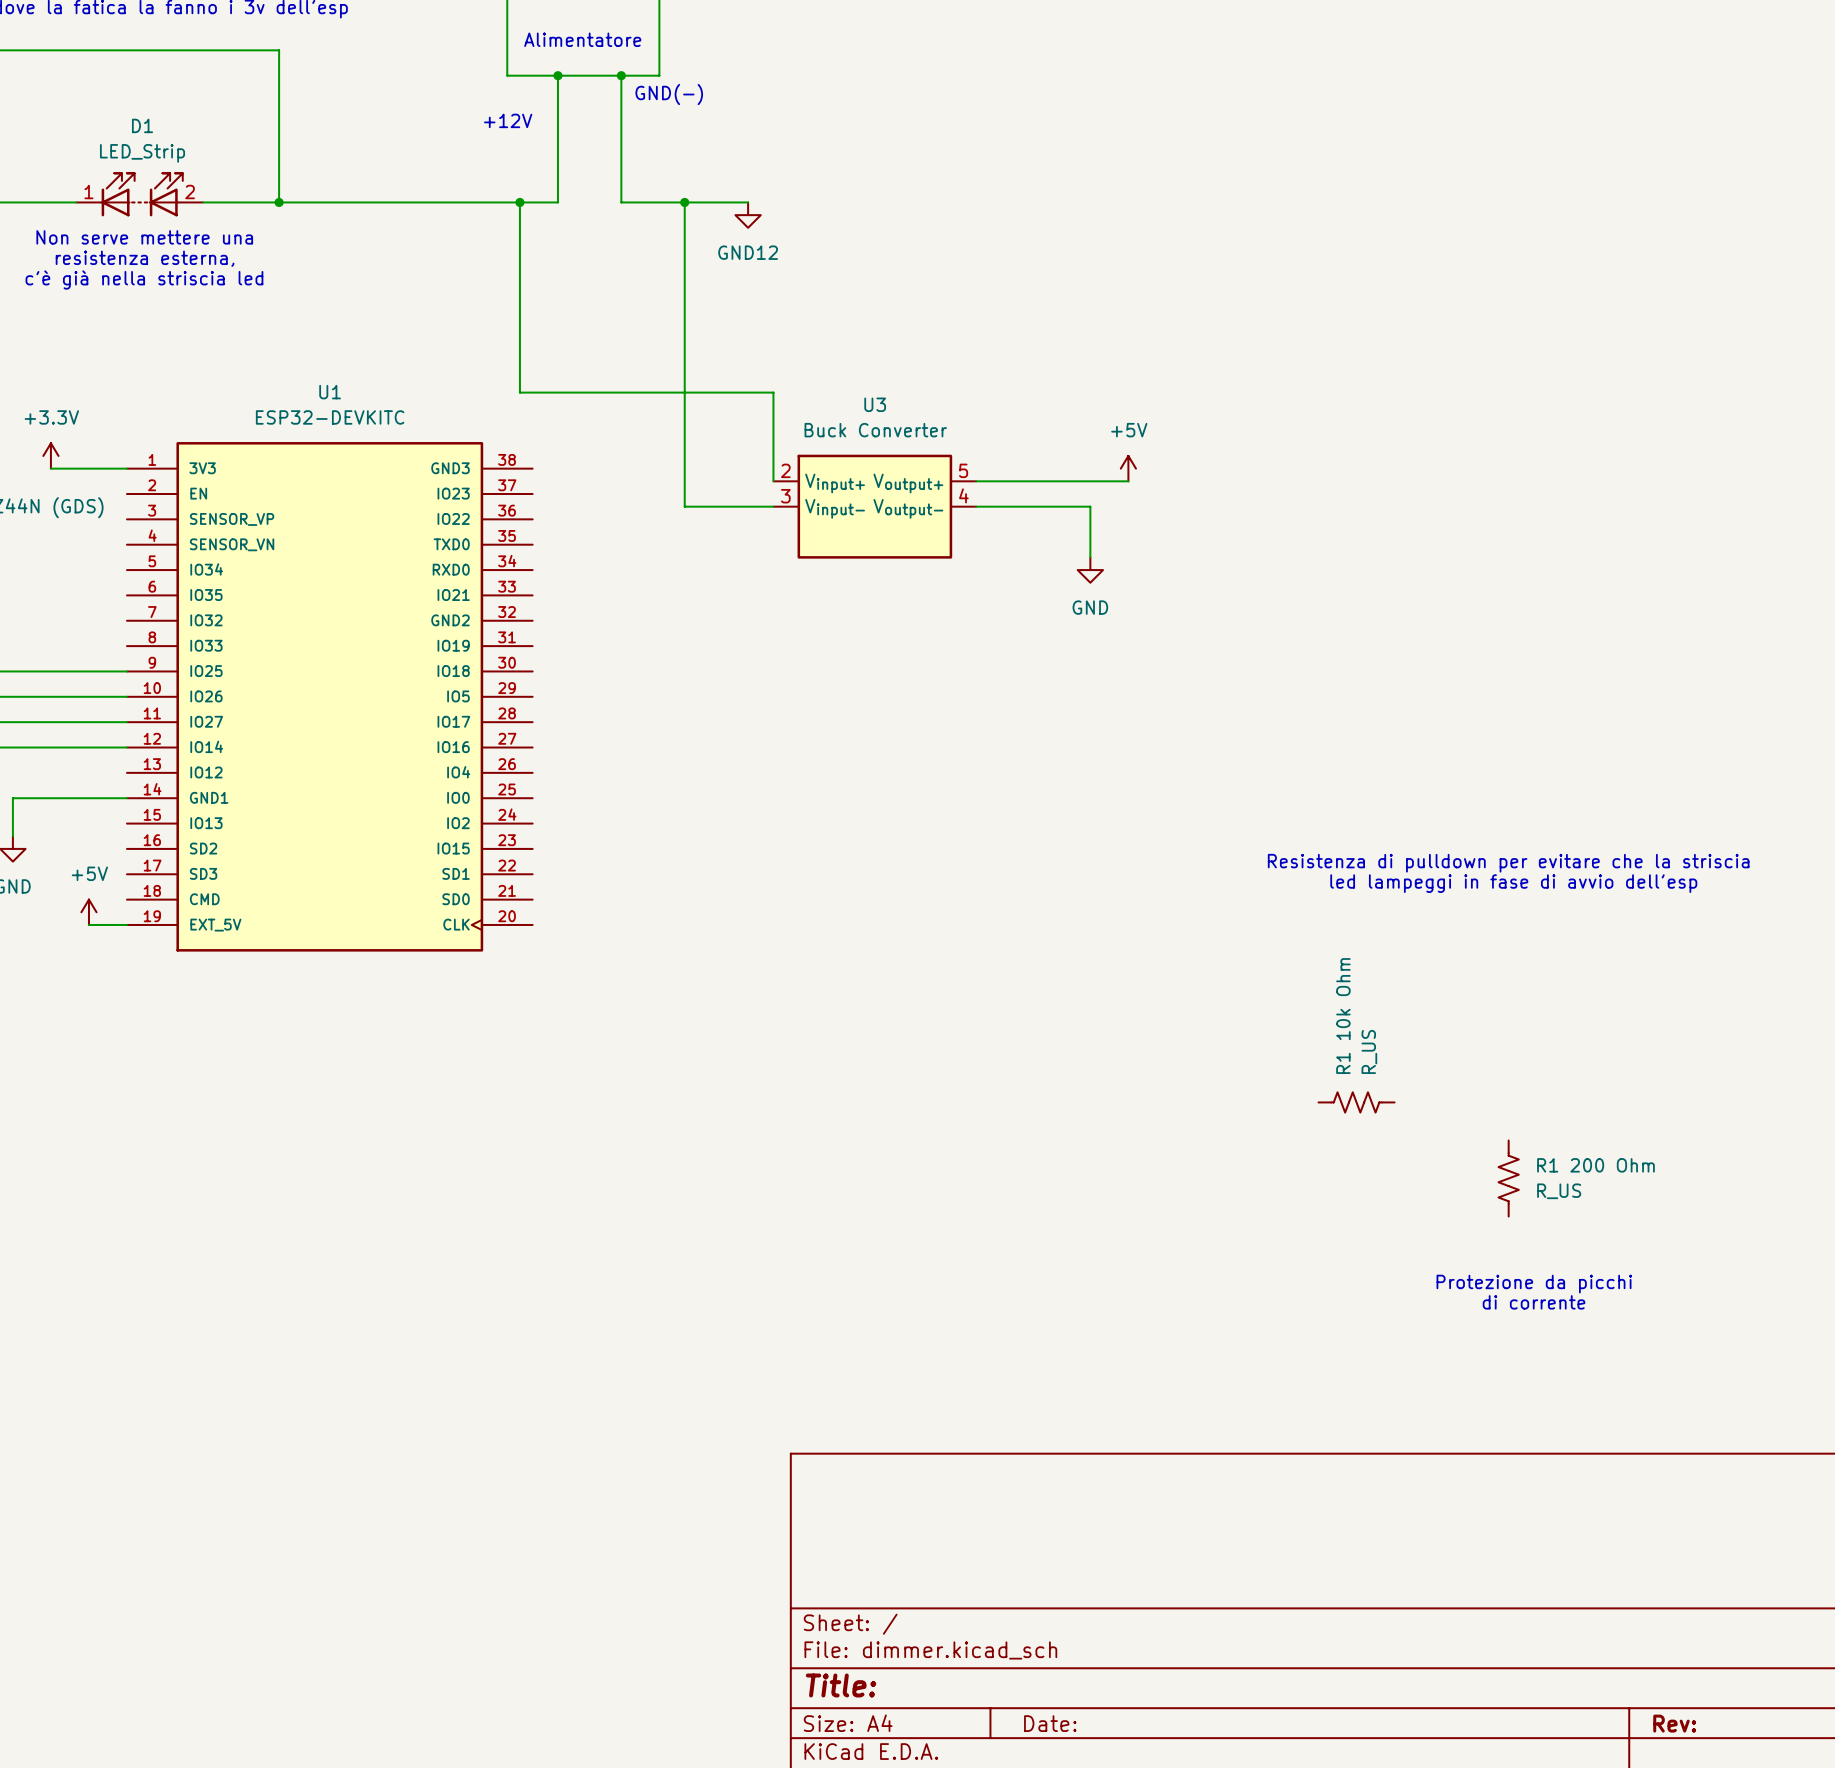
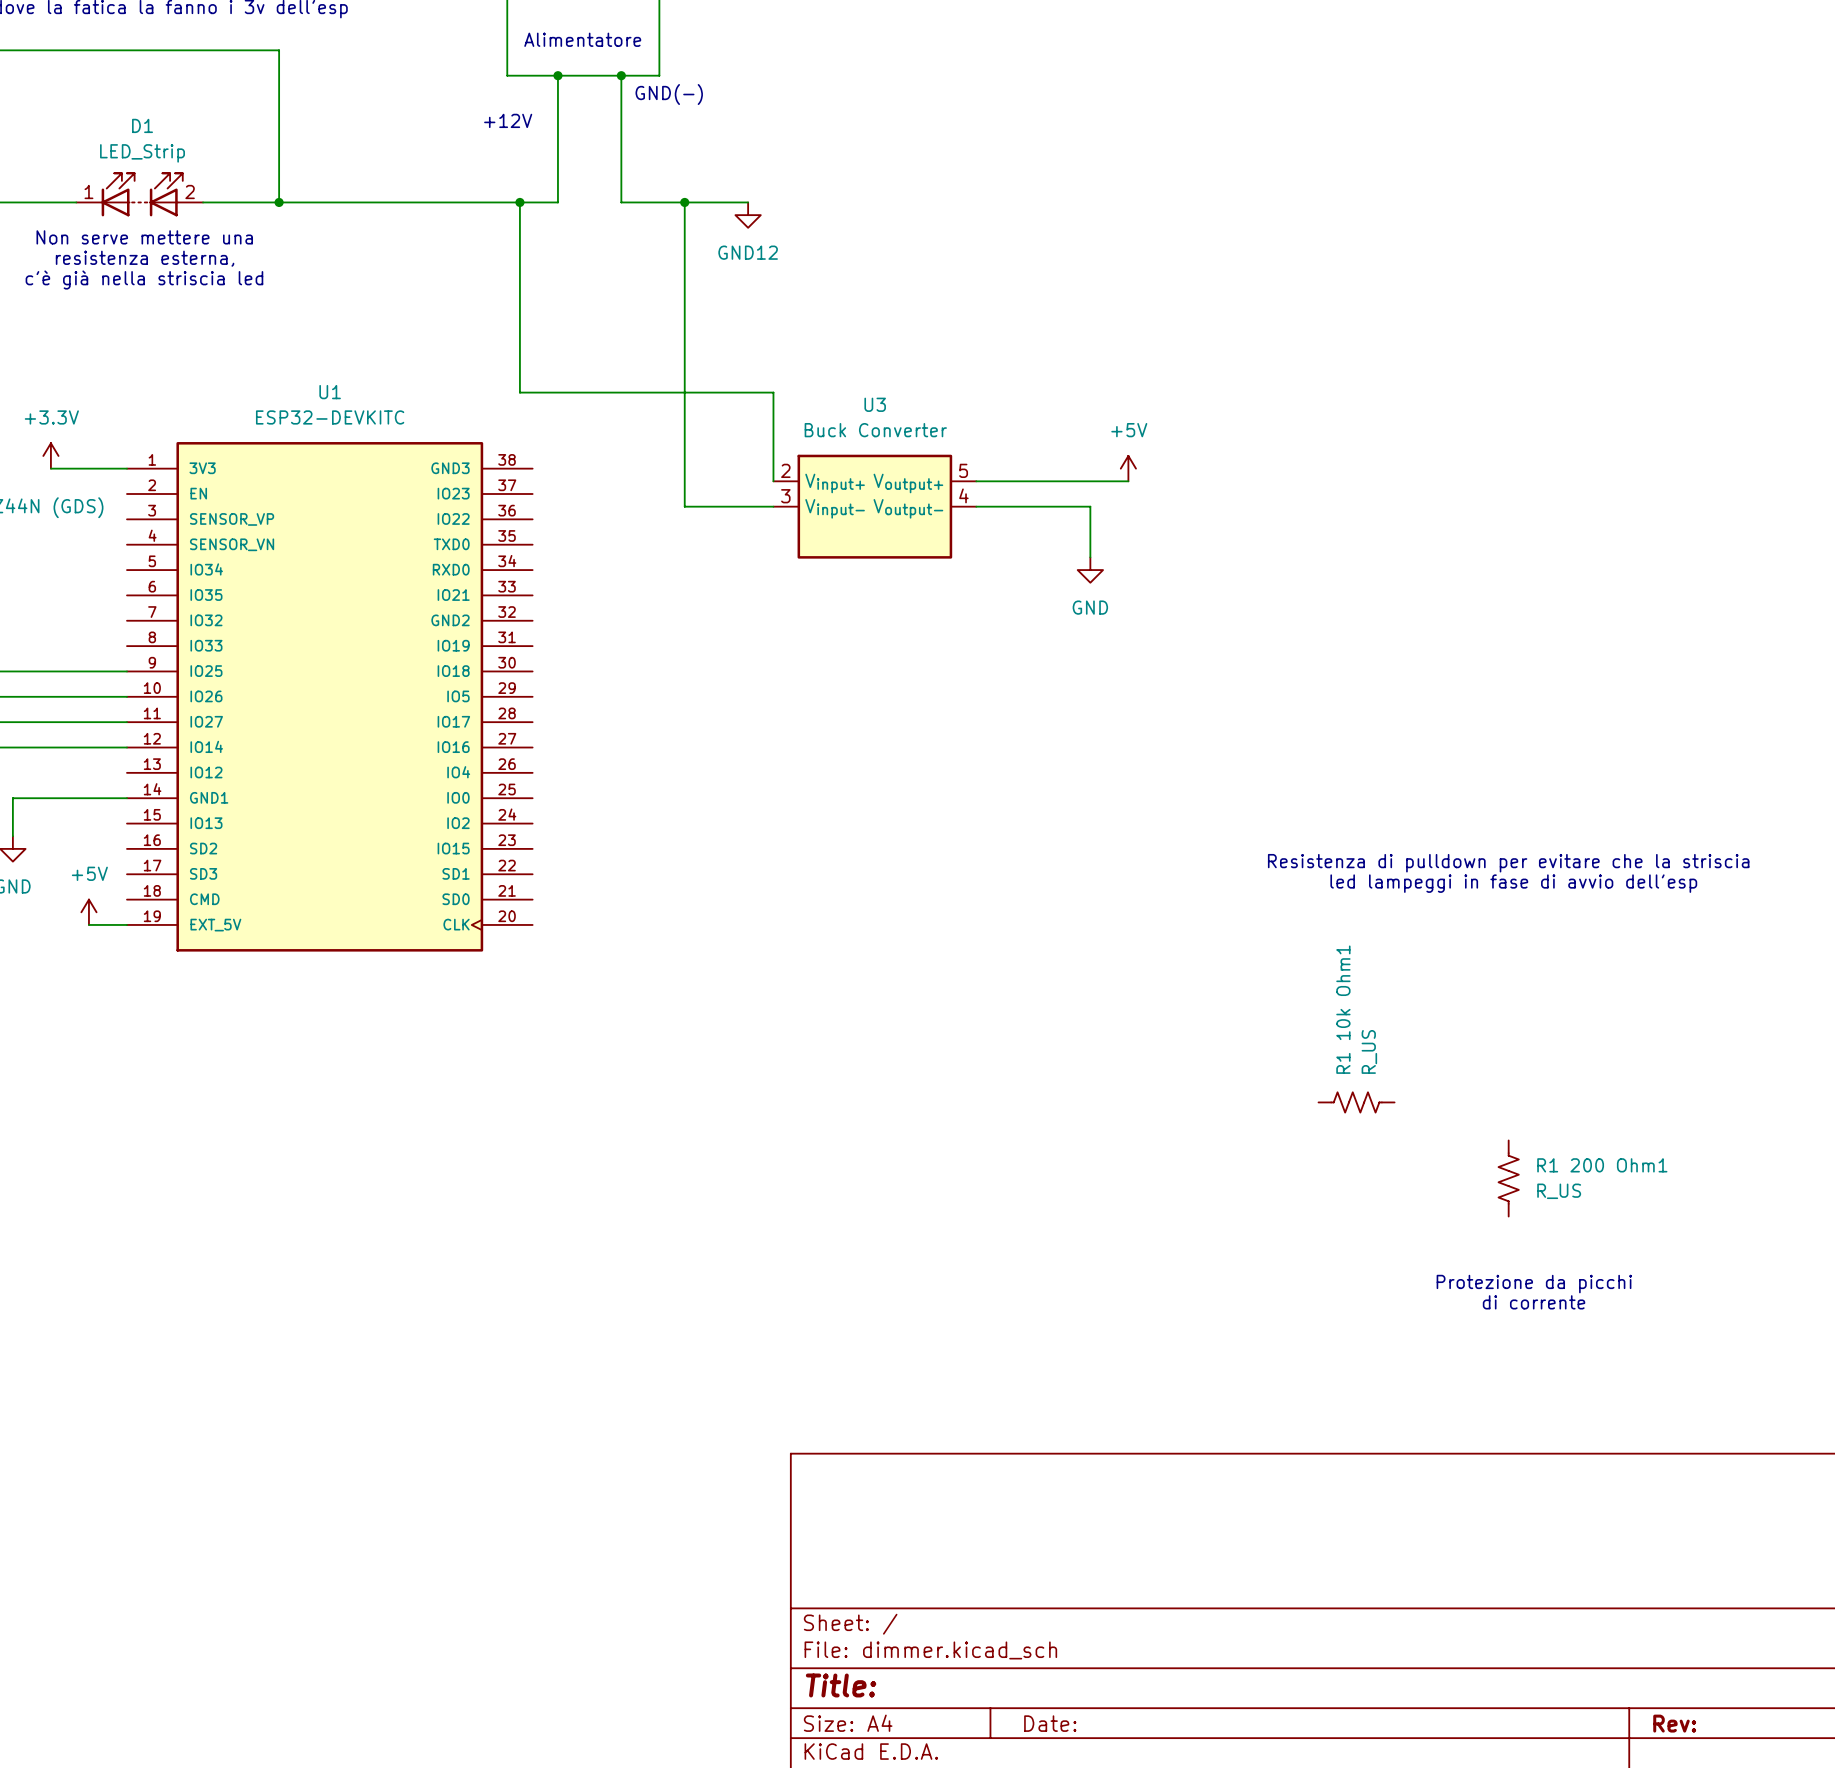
R1 10k Ohm name: R1 10k Ohm (1343, 1016) -> R1 10k Ohm1 (1343, 1009)
R1 200 Ohm name: R1 200 Ohm (1595, 1165) -> R1 200 Ohm1 (1602, 1165)

